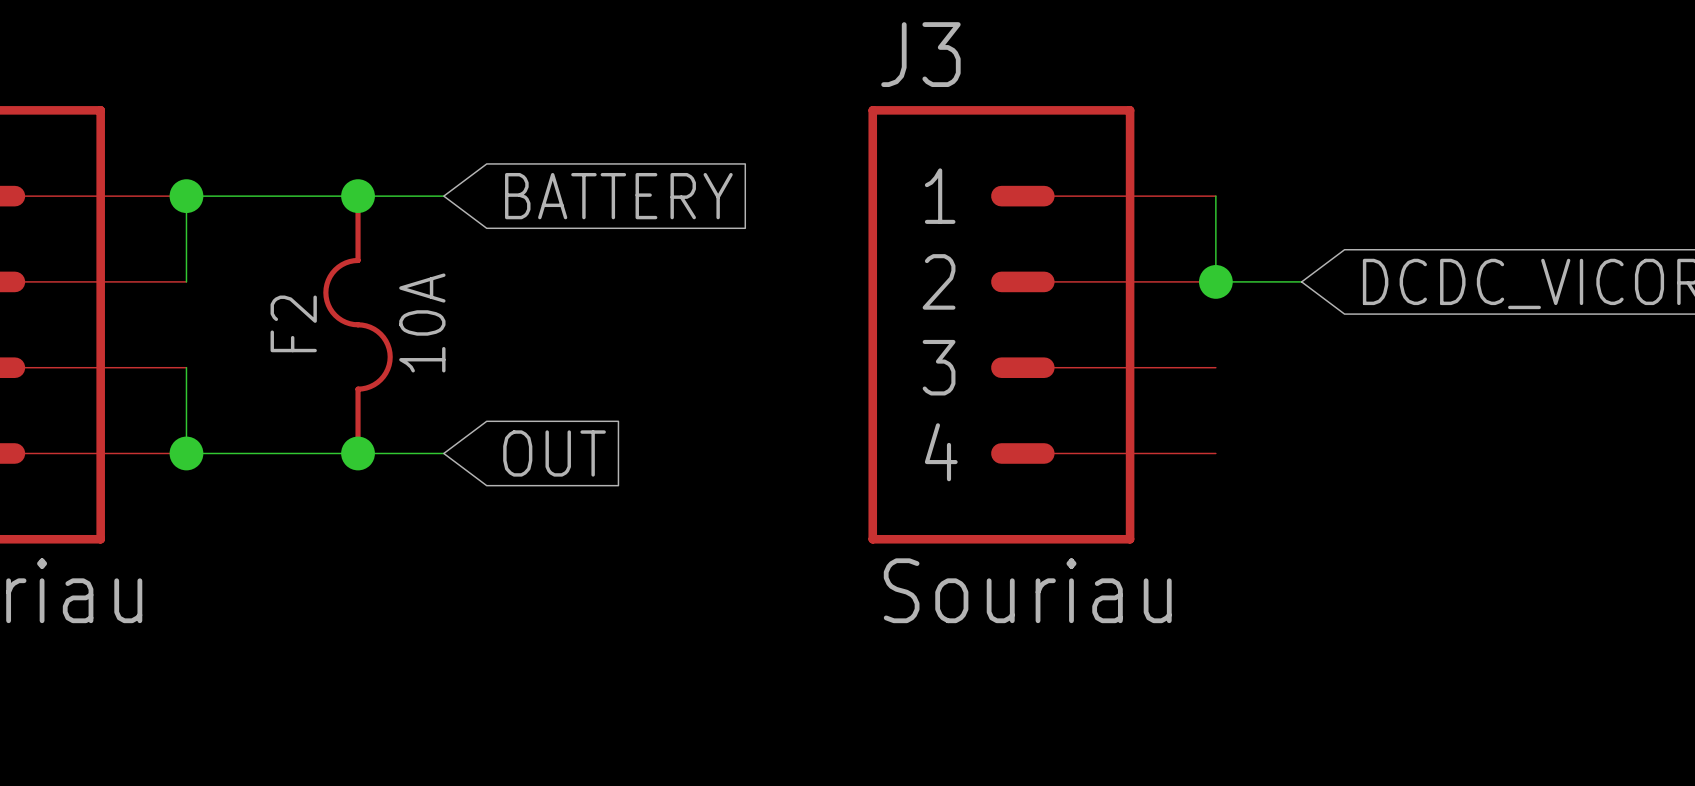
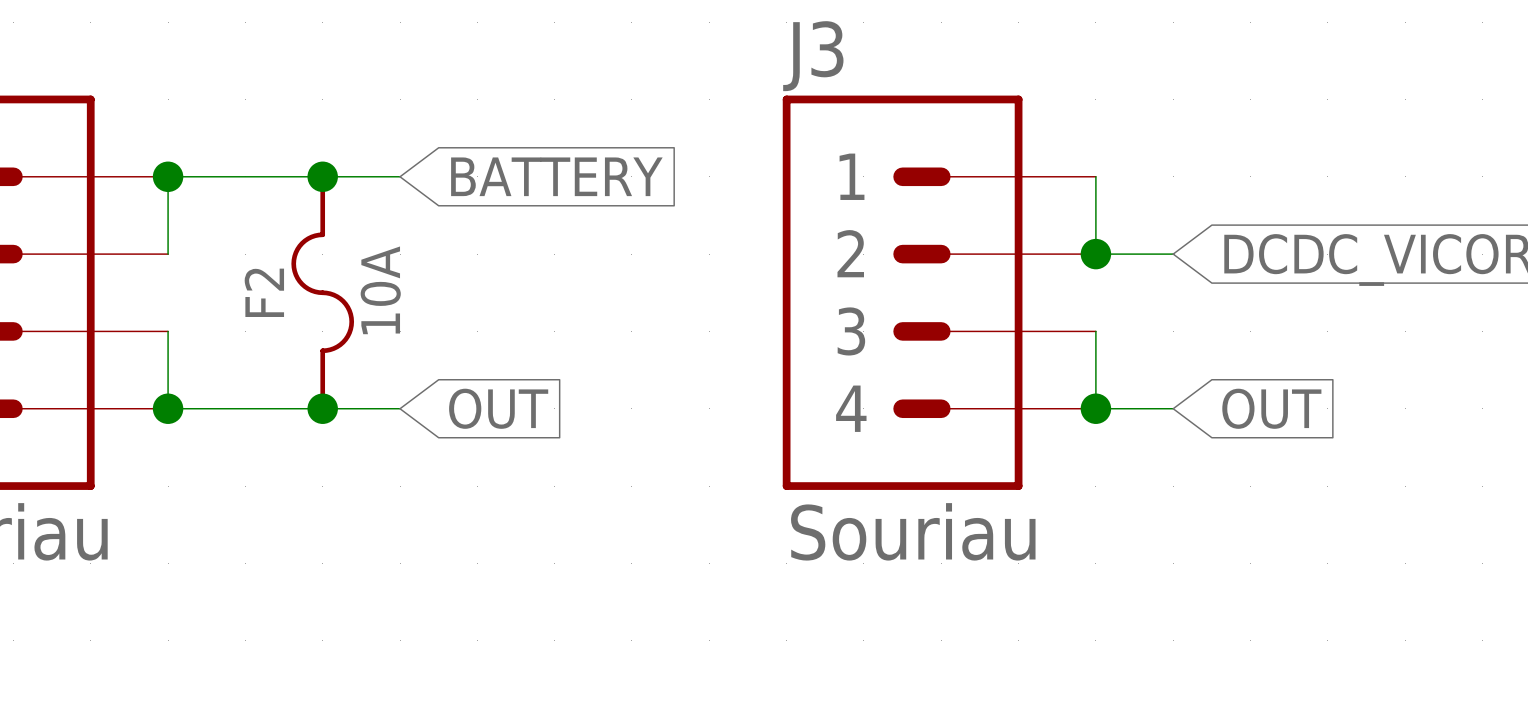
wire: none -> (1095, 331) (1095, 408) (1173, 408)
junction: none -> (1095, 408)
global label: none -> OUT (1271, 408)

